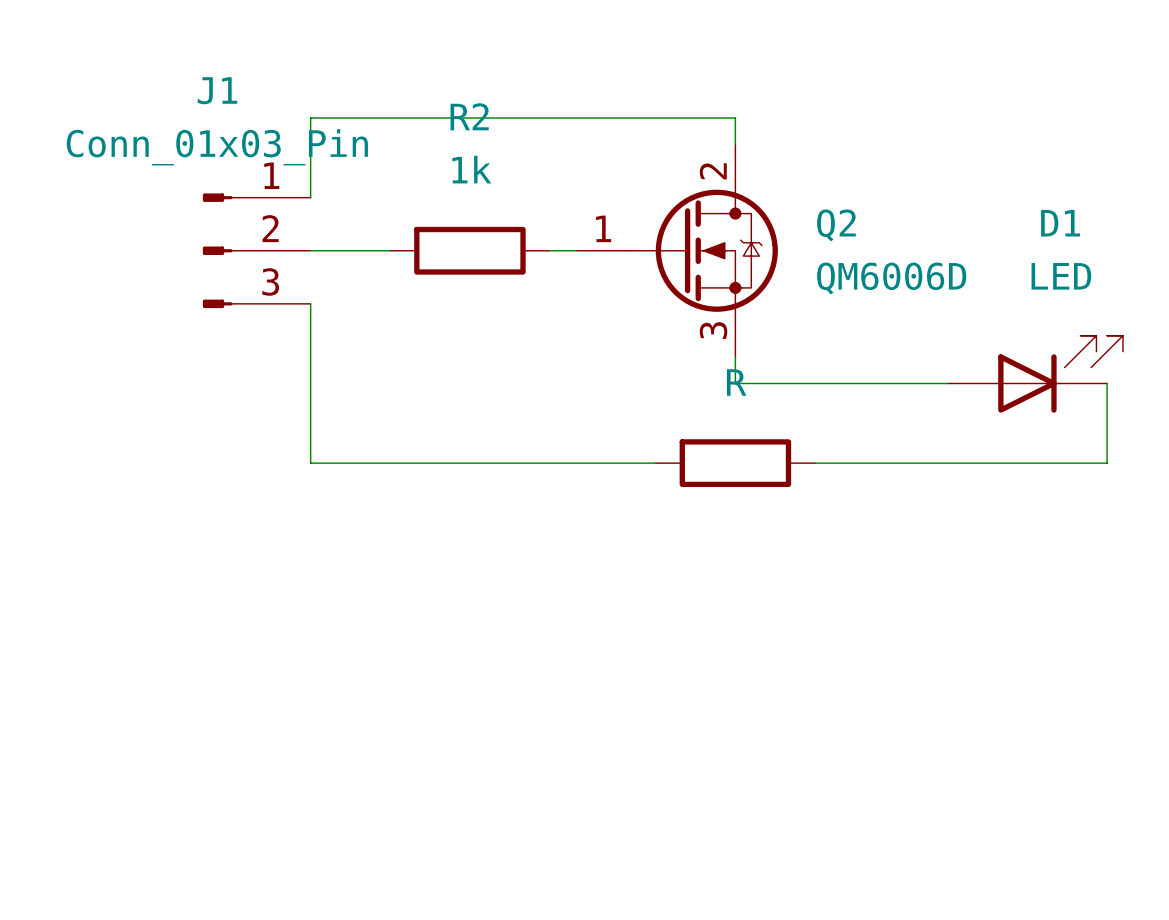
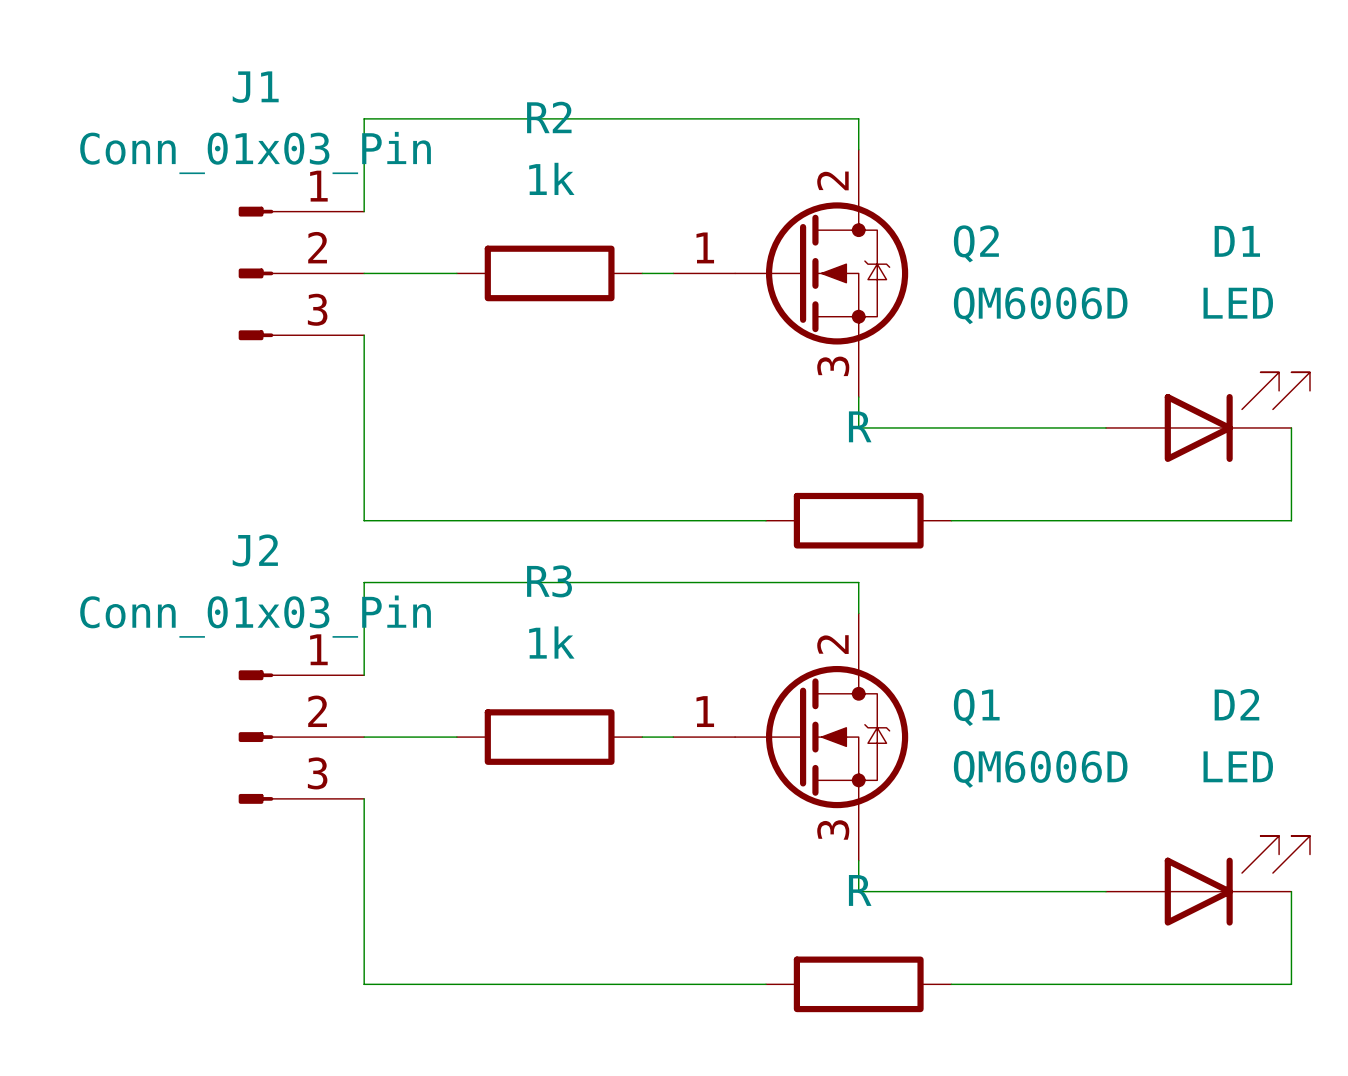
wire: none -> (858, 613) (858, 582) (364, 582) (364, 675)
J2: none -> Conn_01x03_Pin (301, 737)
wire: none -> (364, 737) (456, 737)
R3: none -> 1k (549, 737)
wire: none -> (642, 737) (673, 737)
Q1: none -> QM6006D (790, 737)
wire: none -> (364, 798) (364, 984) (765, 984)
wire: none -> (858, 860) (858, 891) (1105, 891)
D2: none -> LED (1207, 880)
wire: none -> (1291, 891) (1291, 984) (951, 984)
part: none -> R (858, 984)

